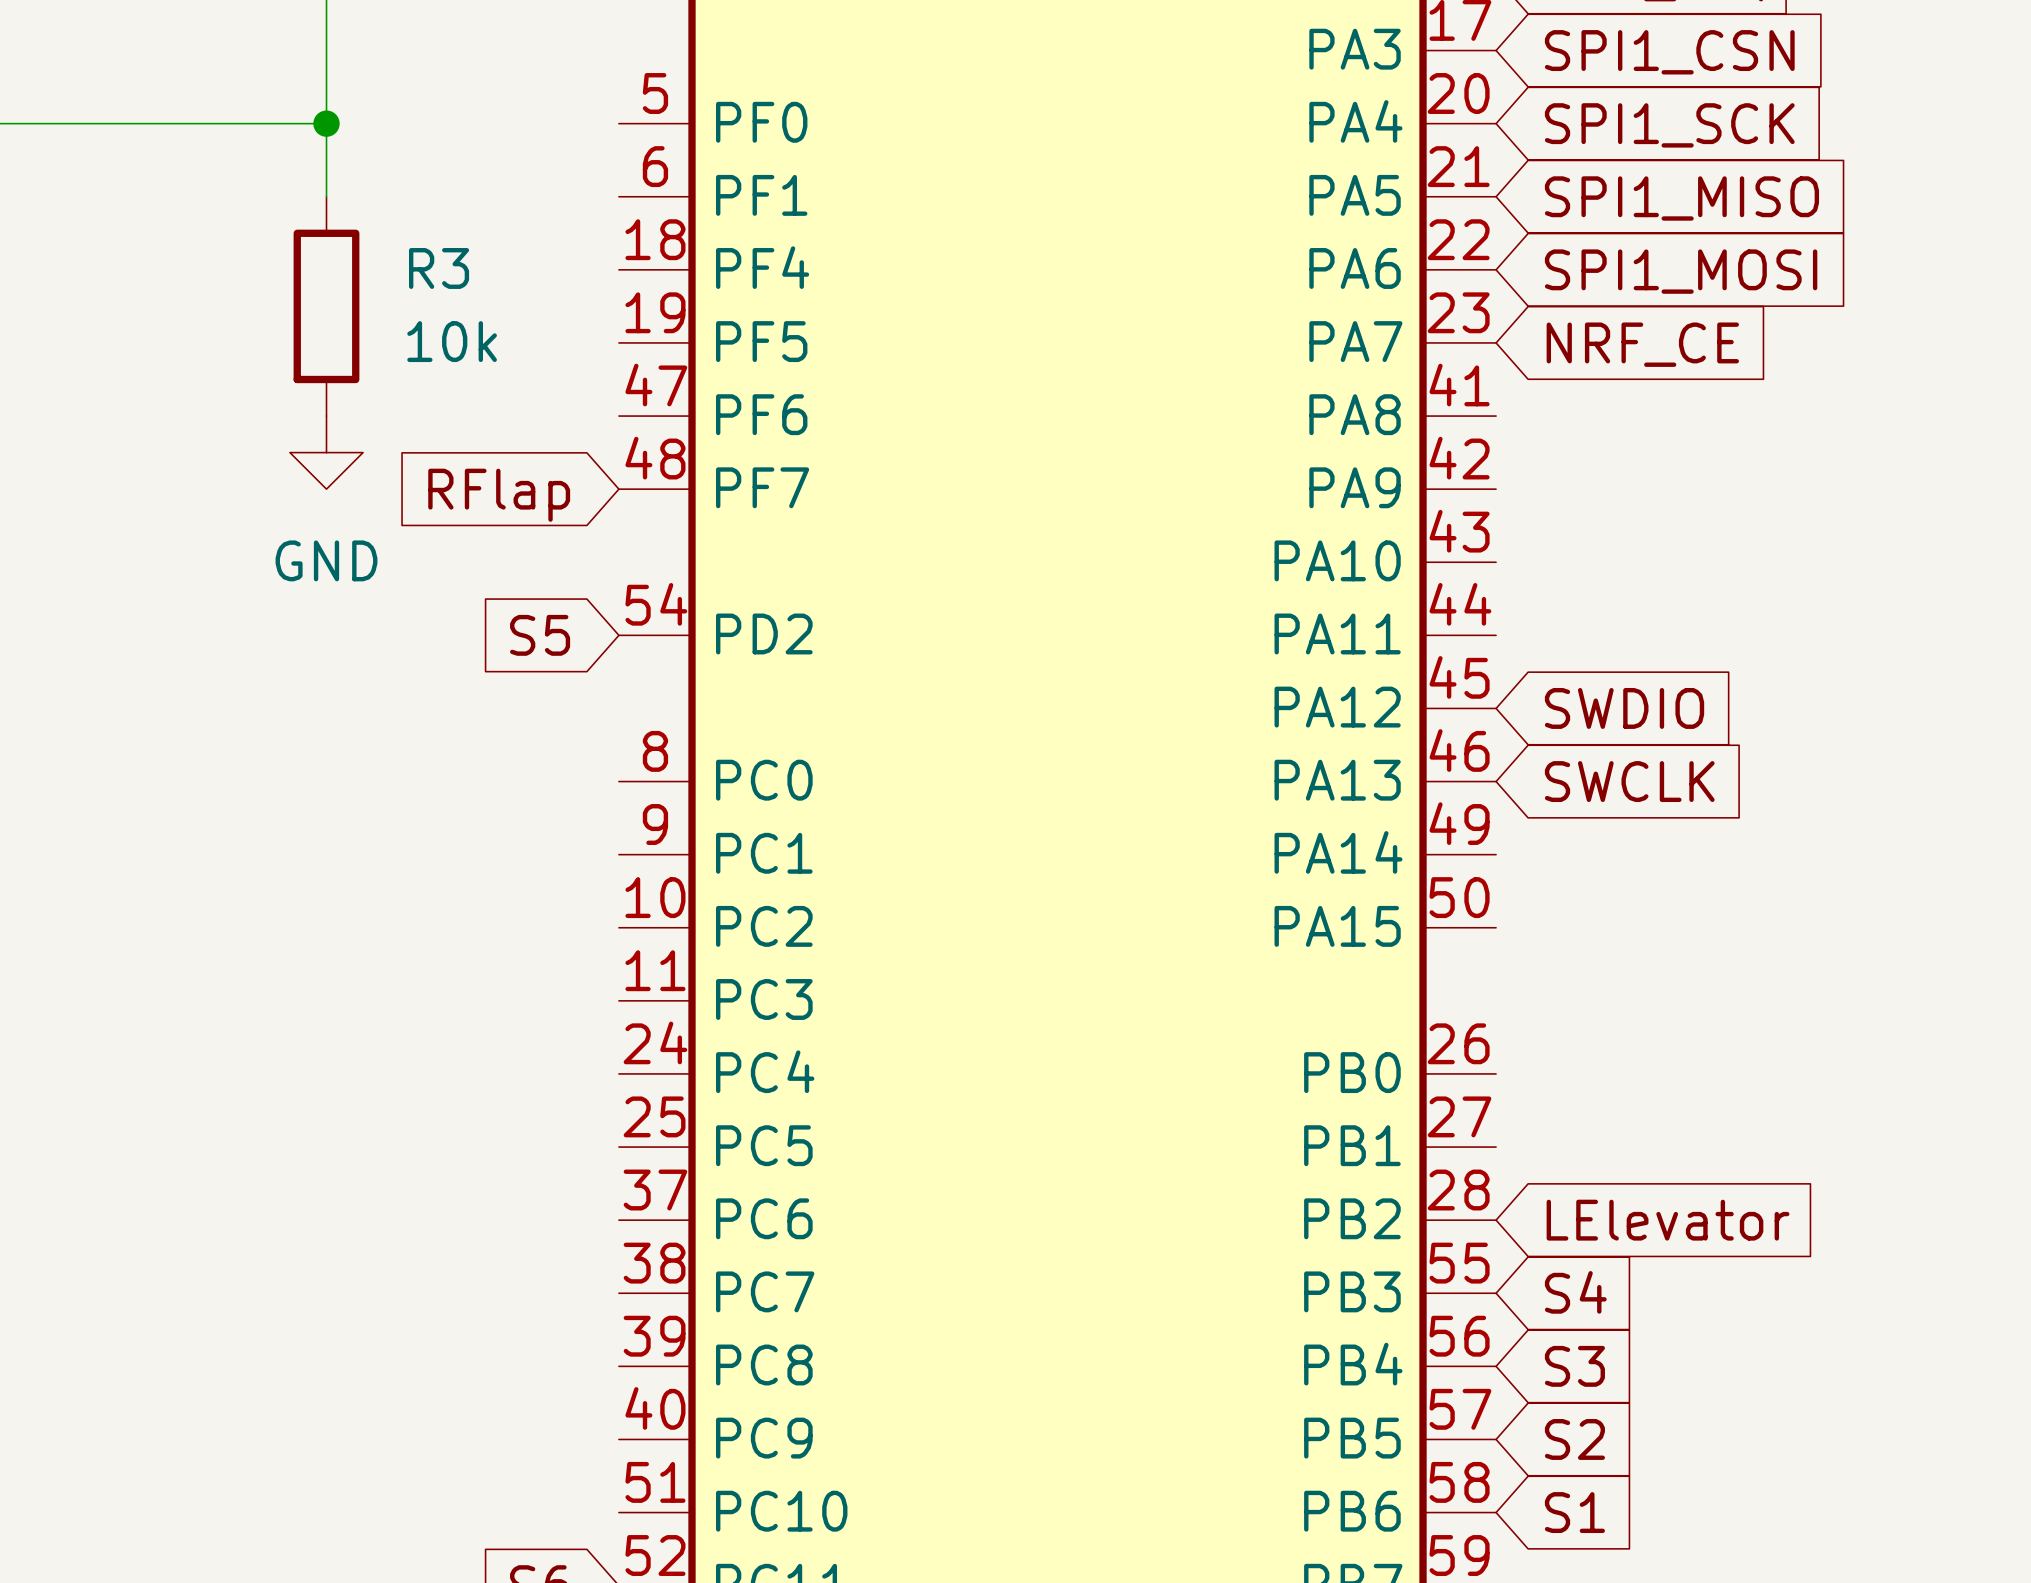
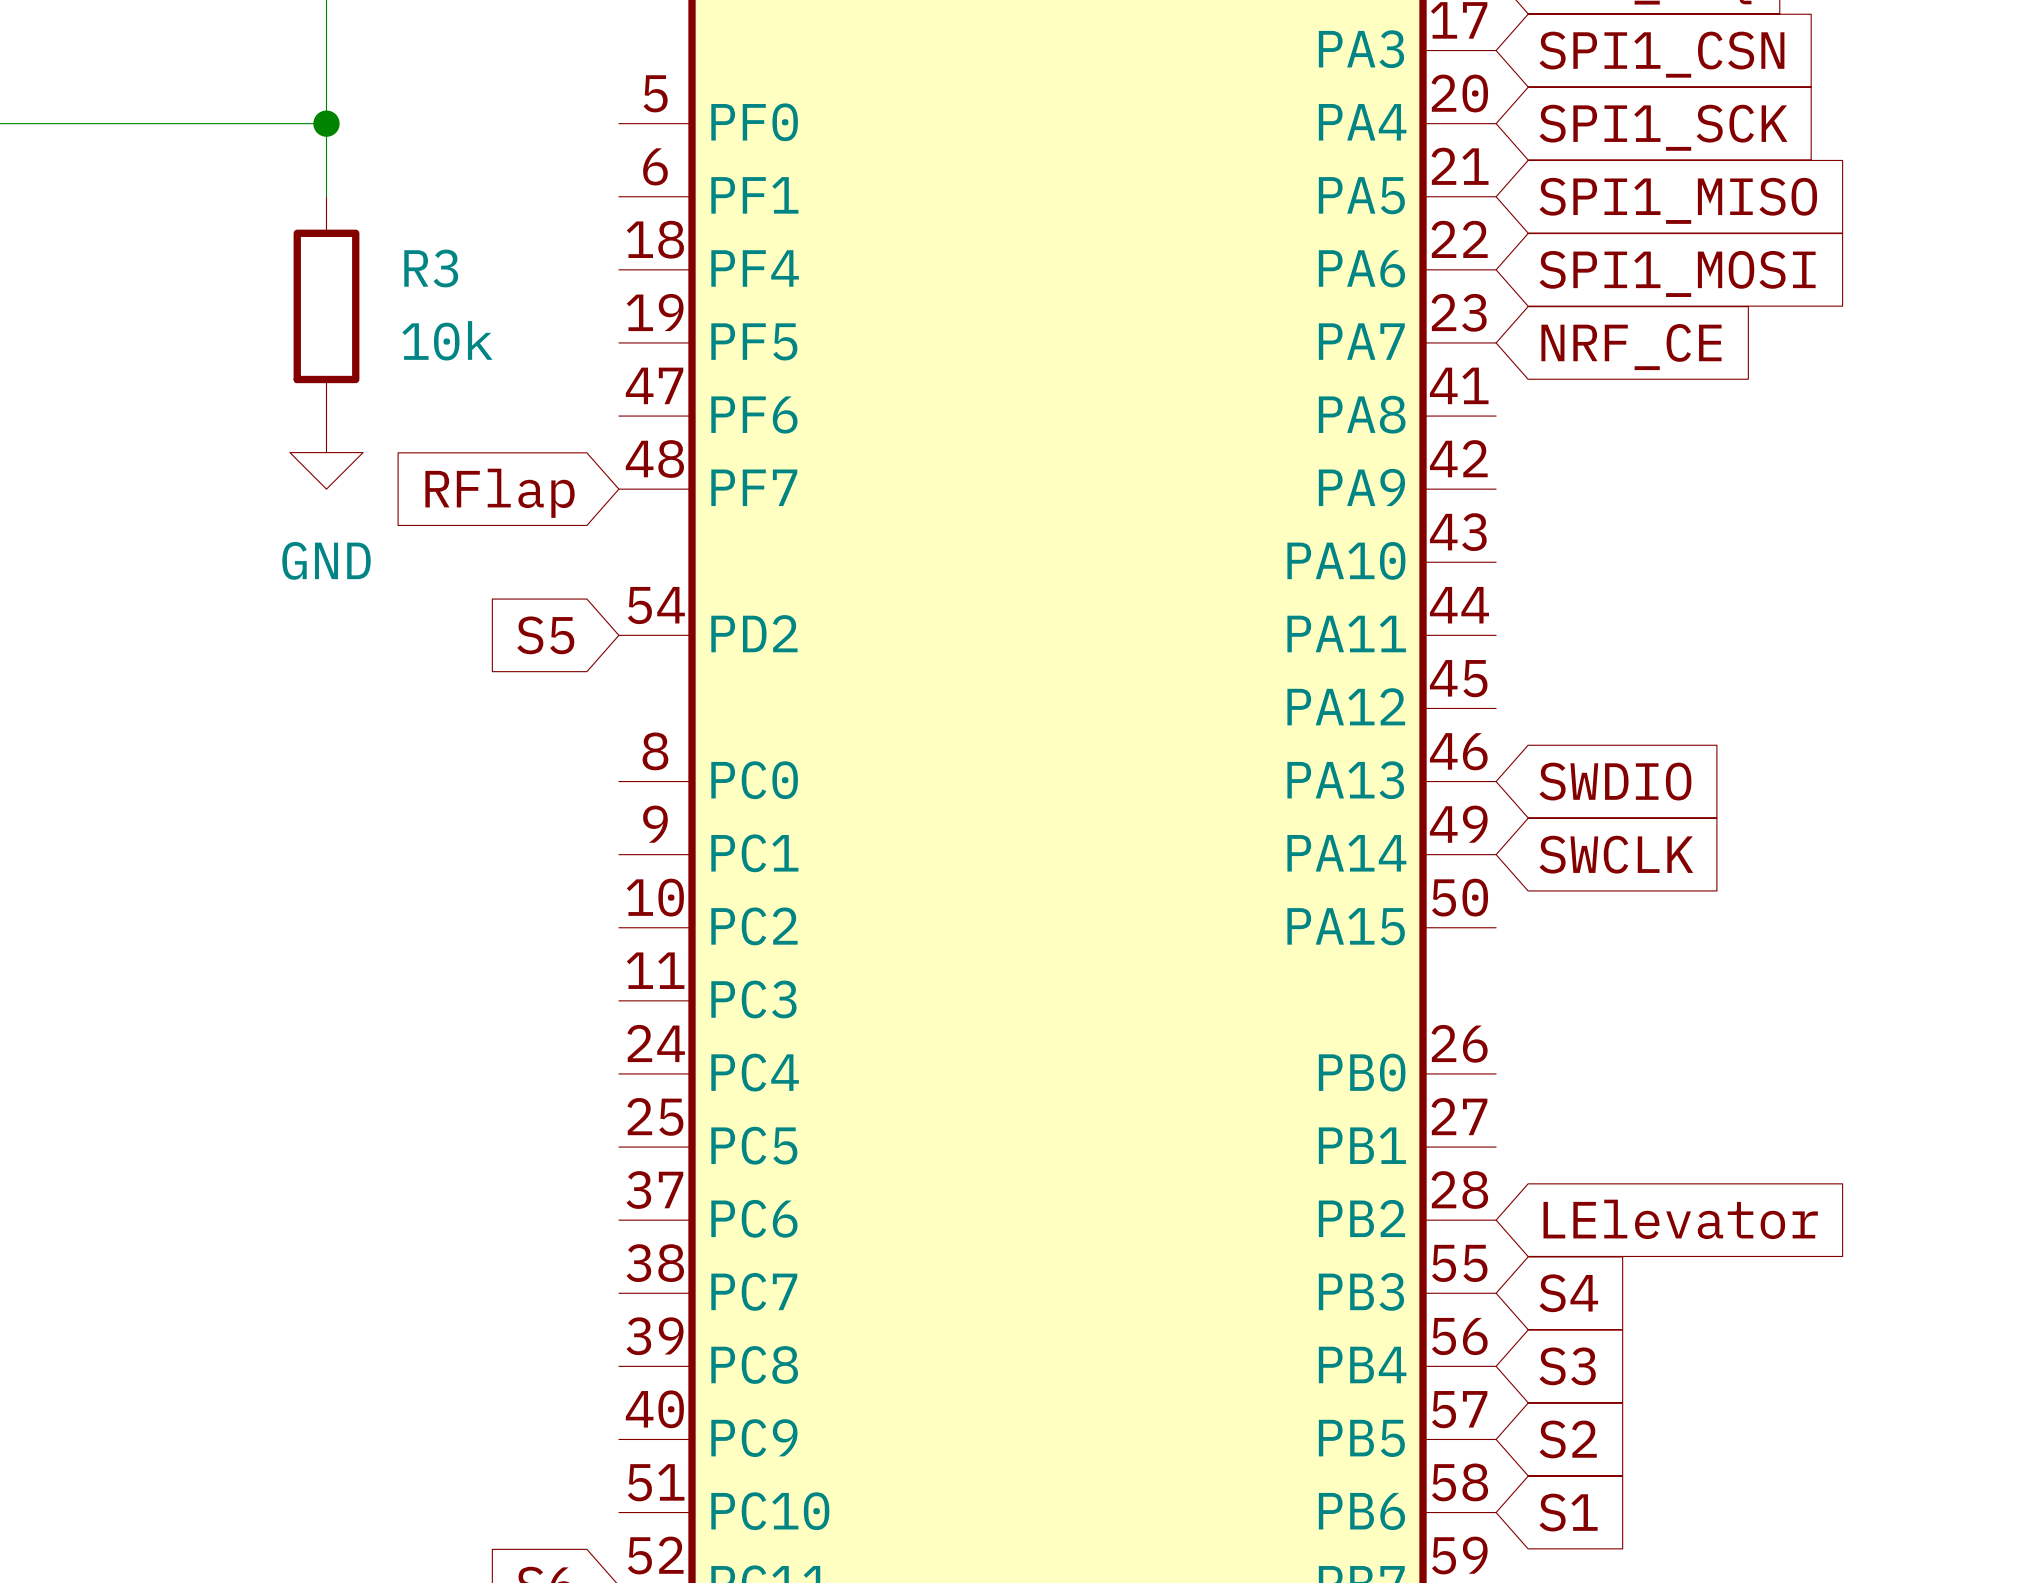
global label: SWDIO (1624, 708) -> none
global label: SWCLK (1629, 781) -> SWDIO (1615, 781)
global label: none -> SWCLK (1616, 854)

